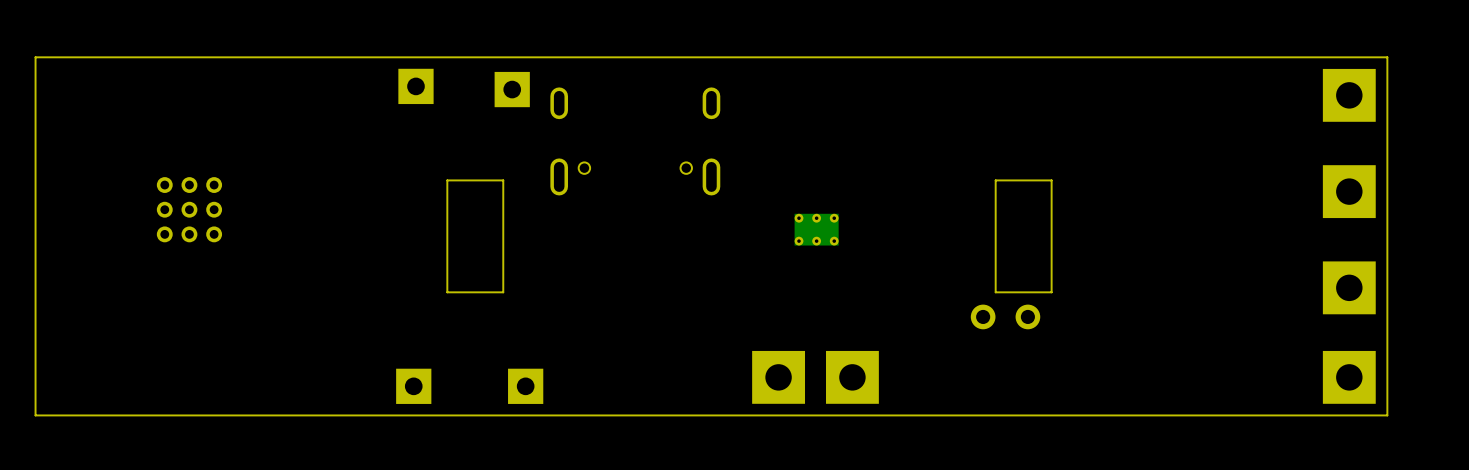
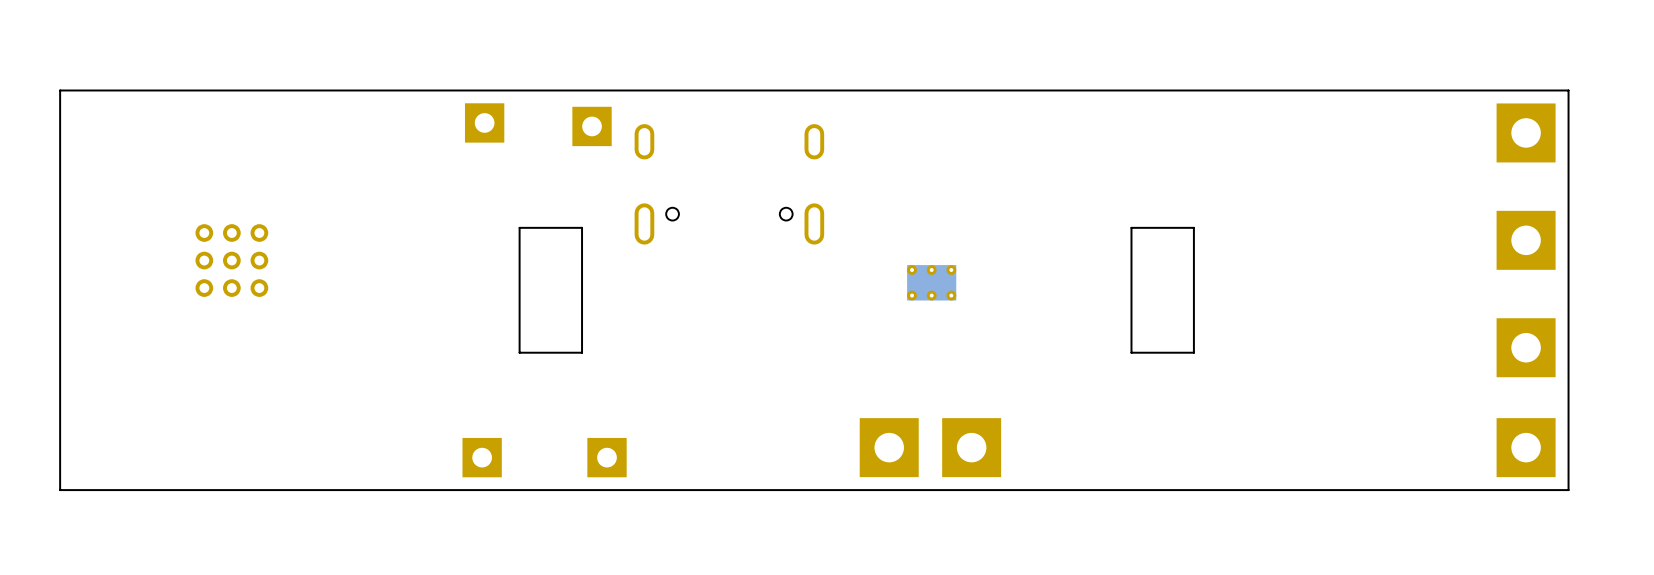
part: (1005, 316) -> none

